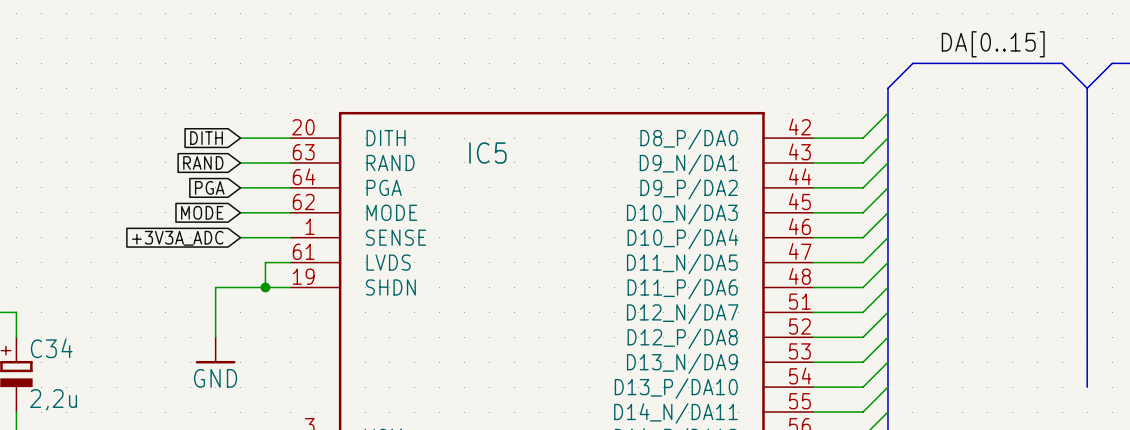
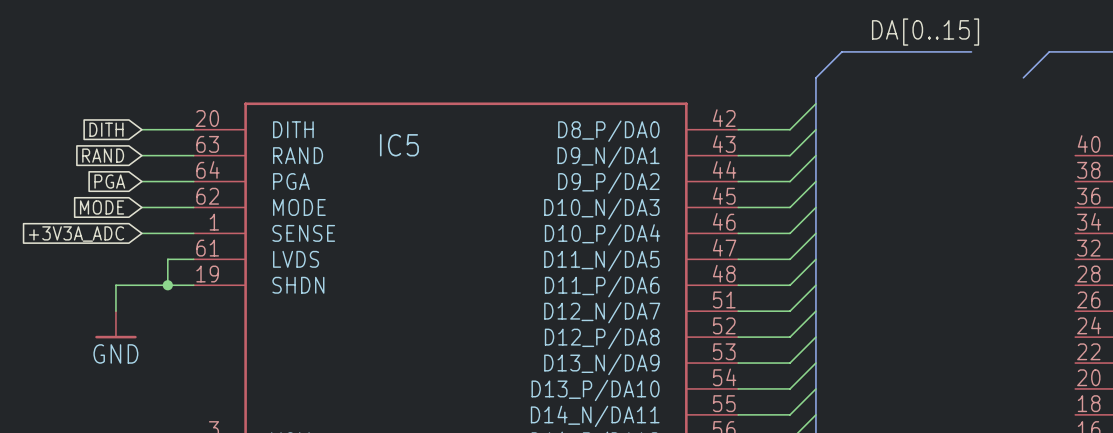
bus: (1037, 63) (1062, 63) (1087, 88) (1087, 387) -> none
power symbol position: GND (215, 350) -> GND (115, 324)

